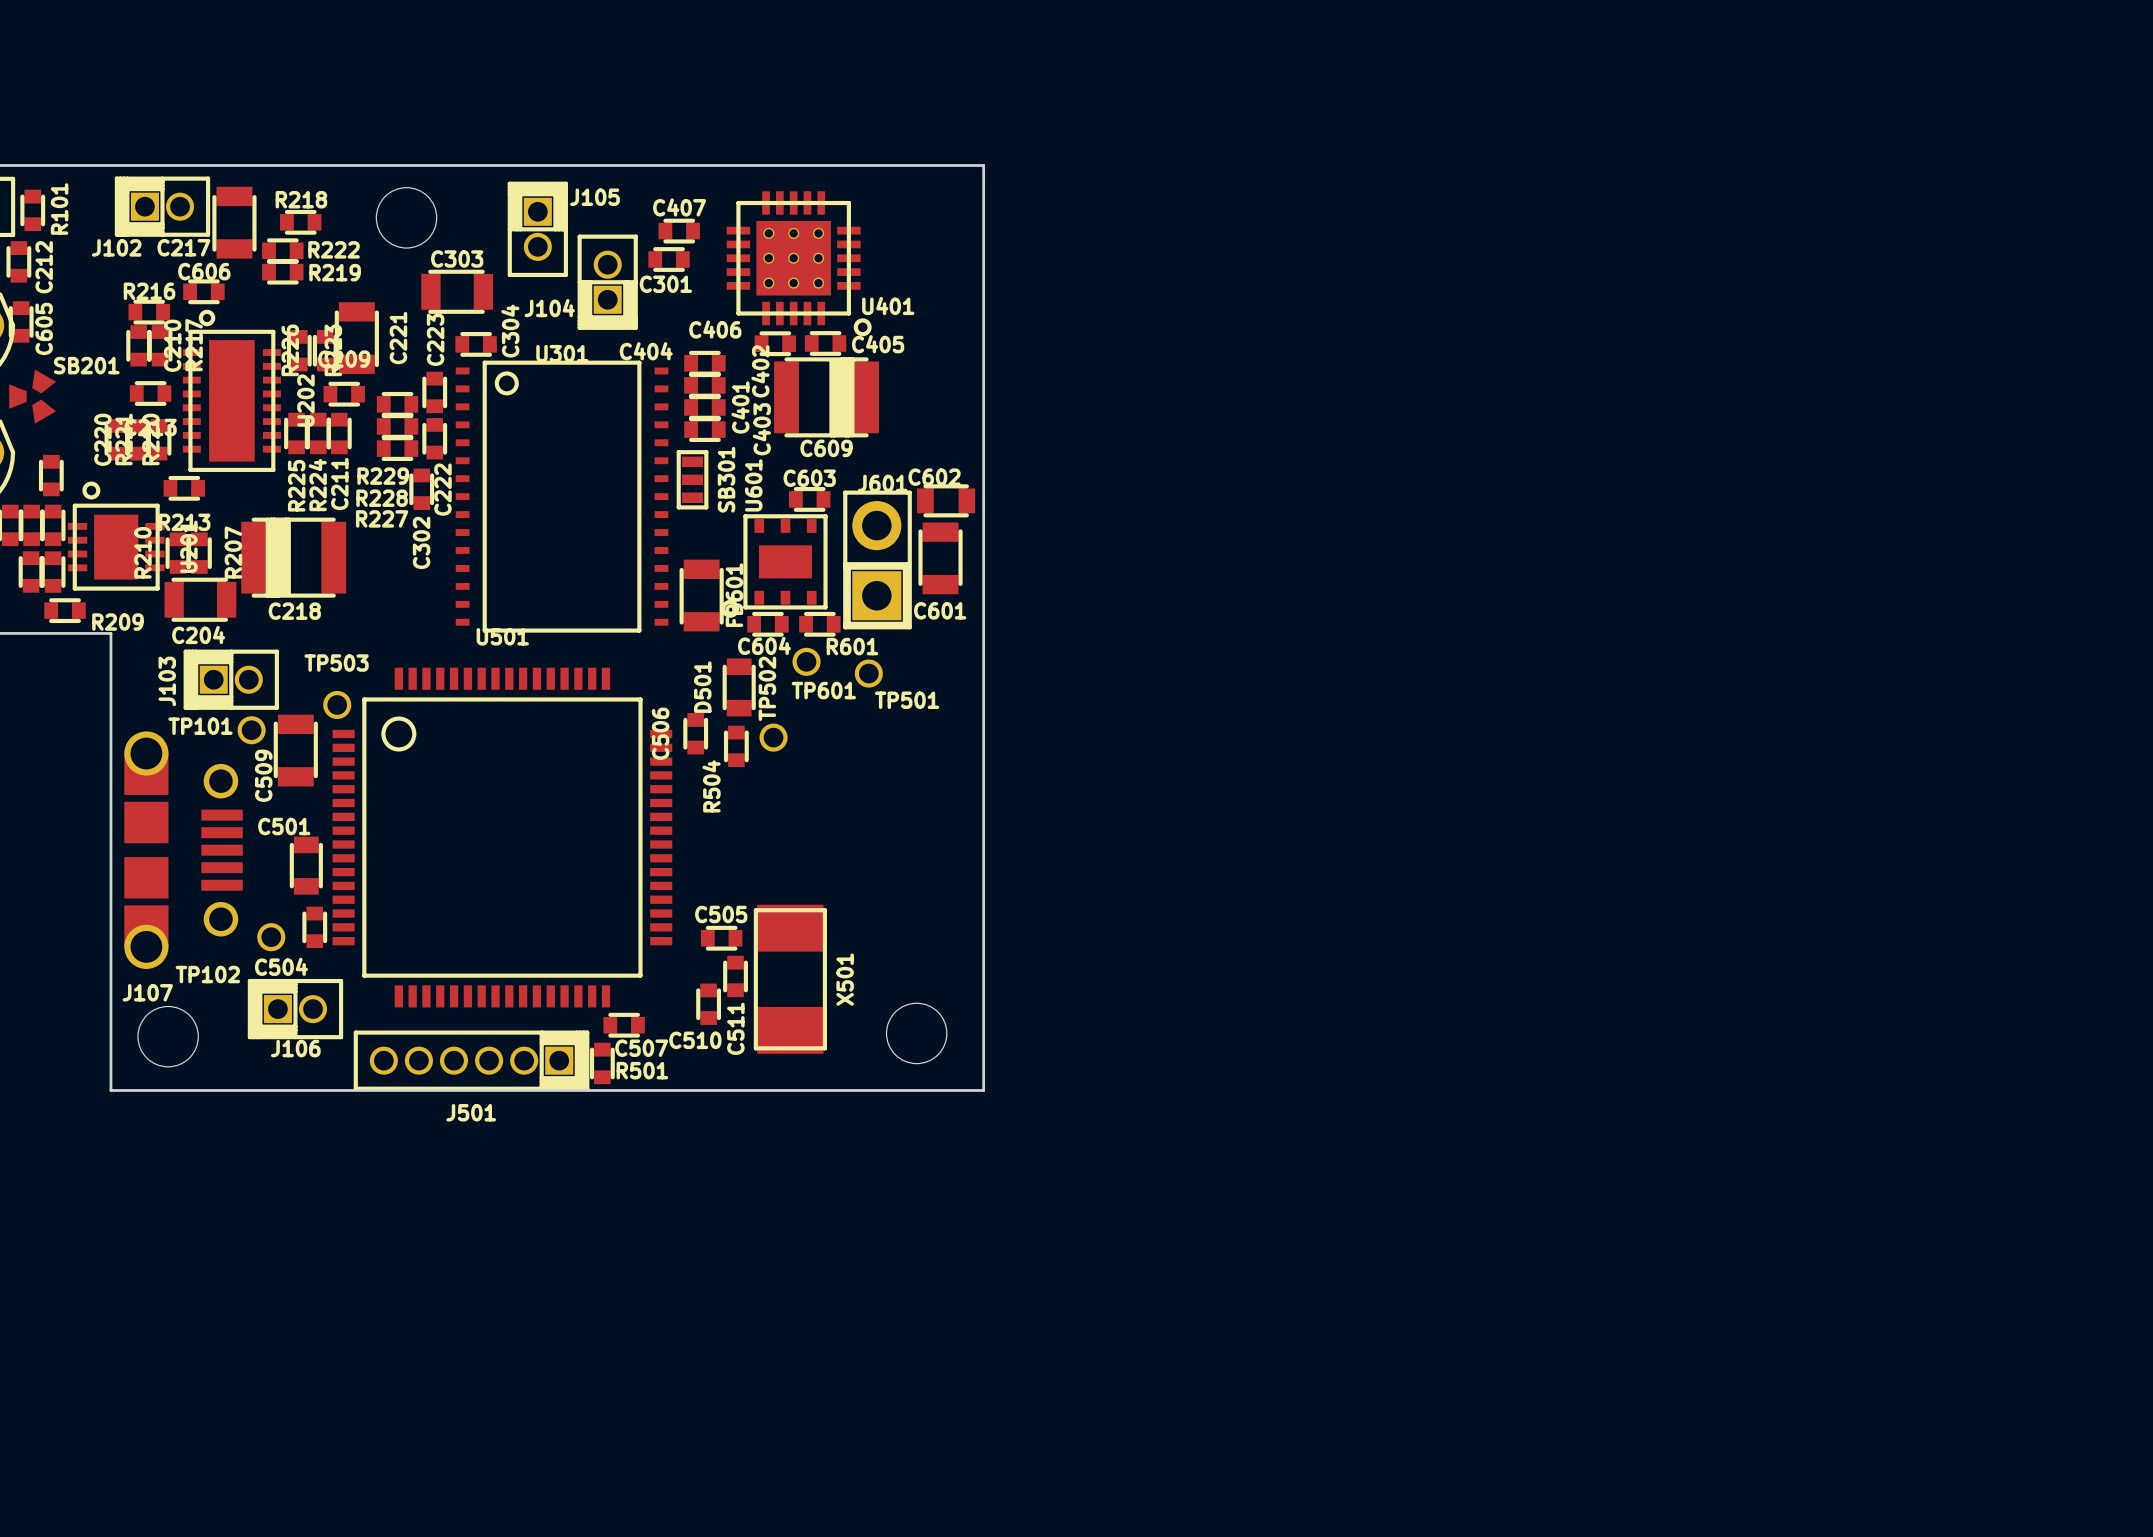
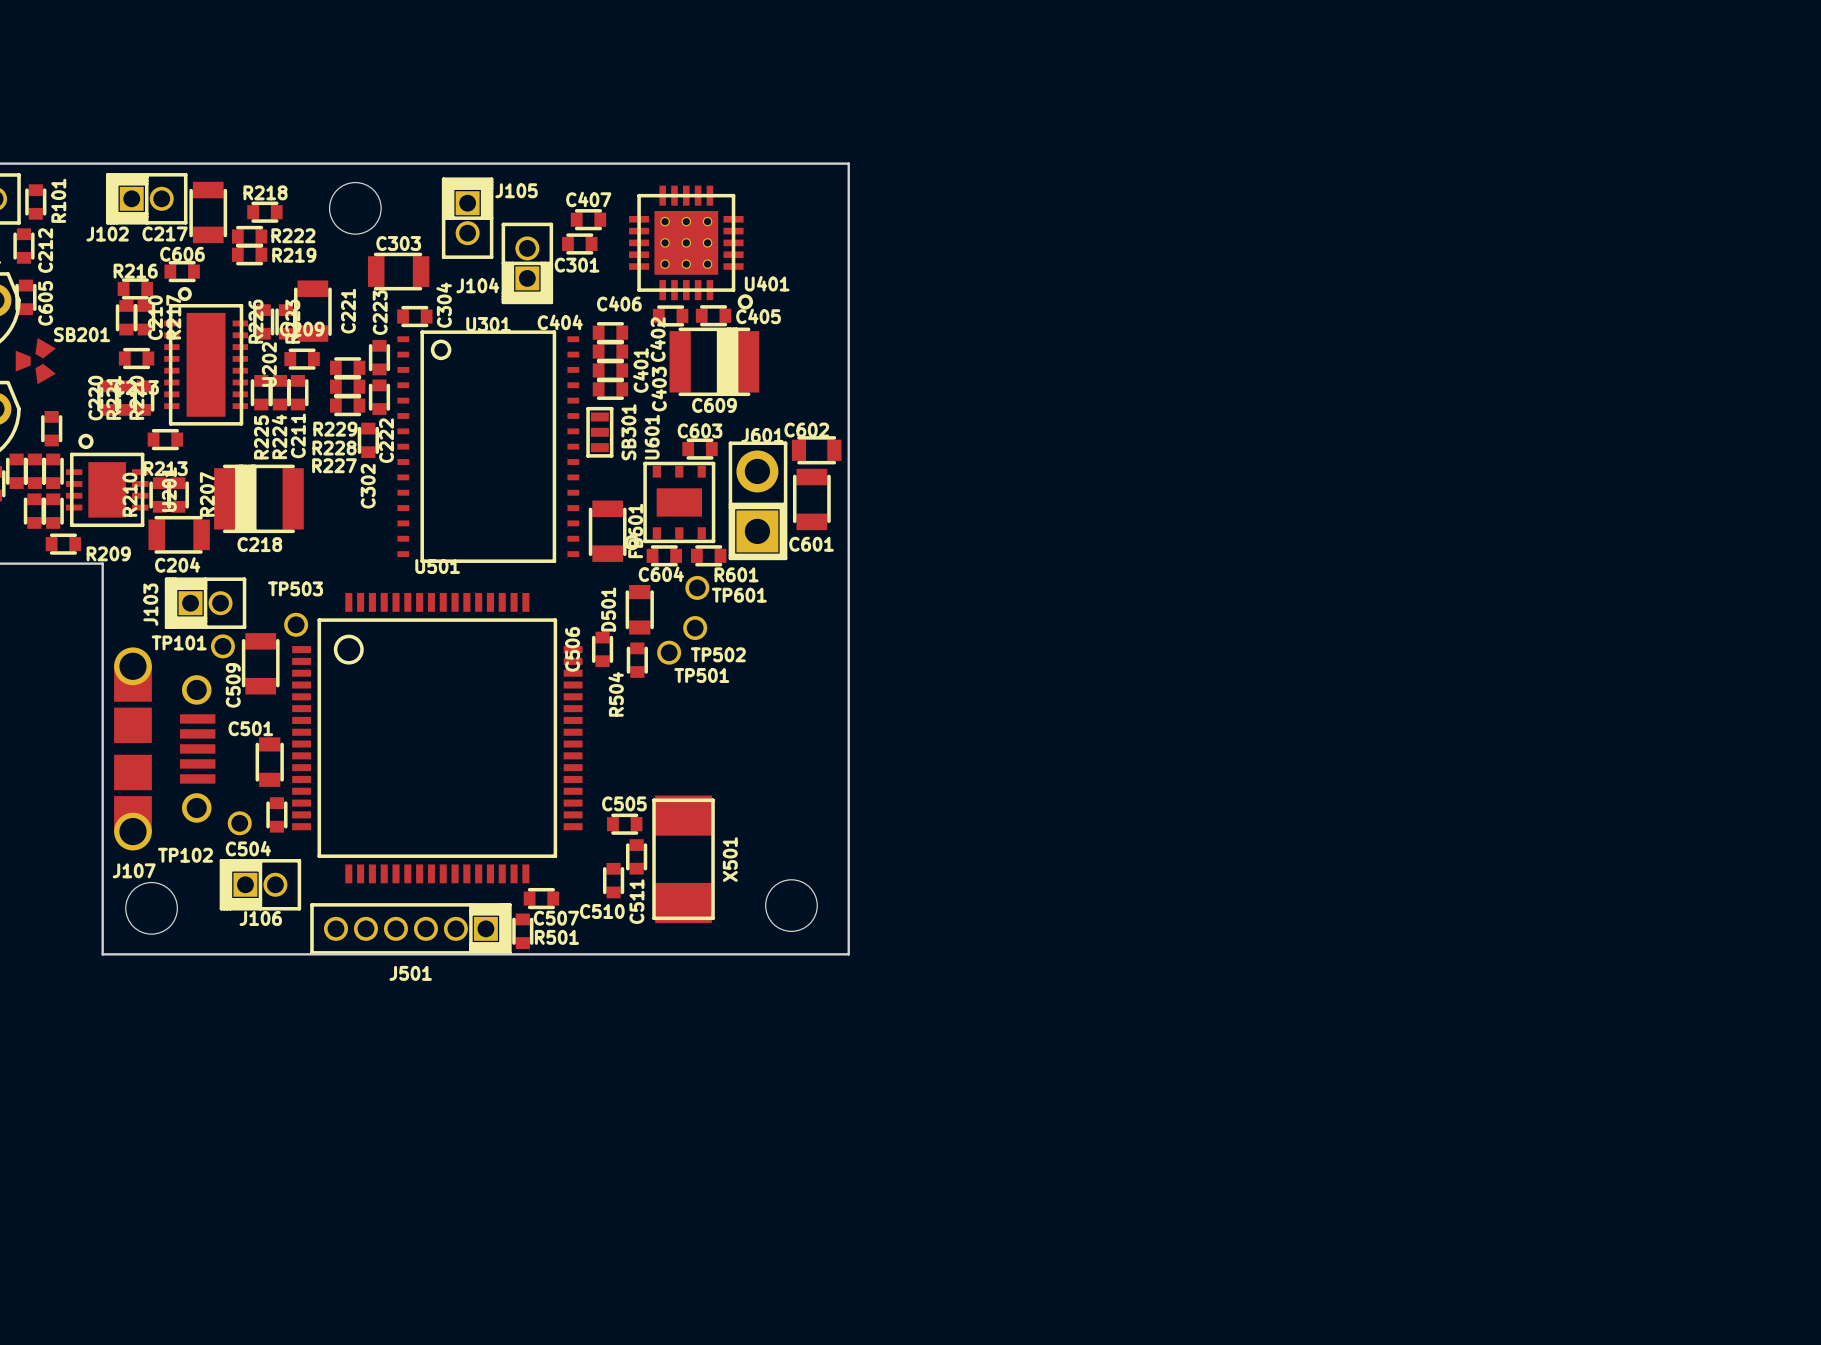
TP501: (868, 673) -> none
TP502 name: TP502 (767, 688) -> TP501 (701, 675)
TP601 name position: TP601 (823, 690) -> TP601 (739, 595)
TP502: none -> (695, 628)

